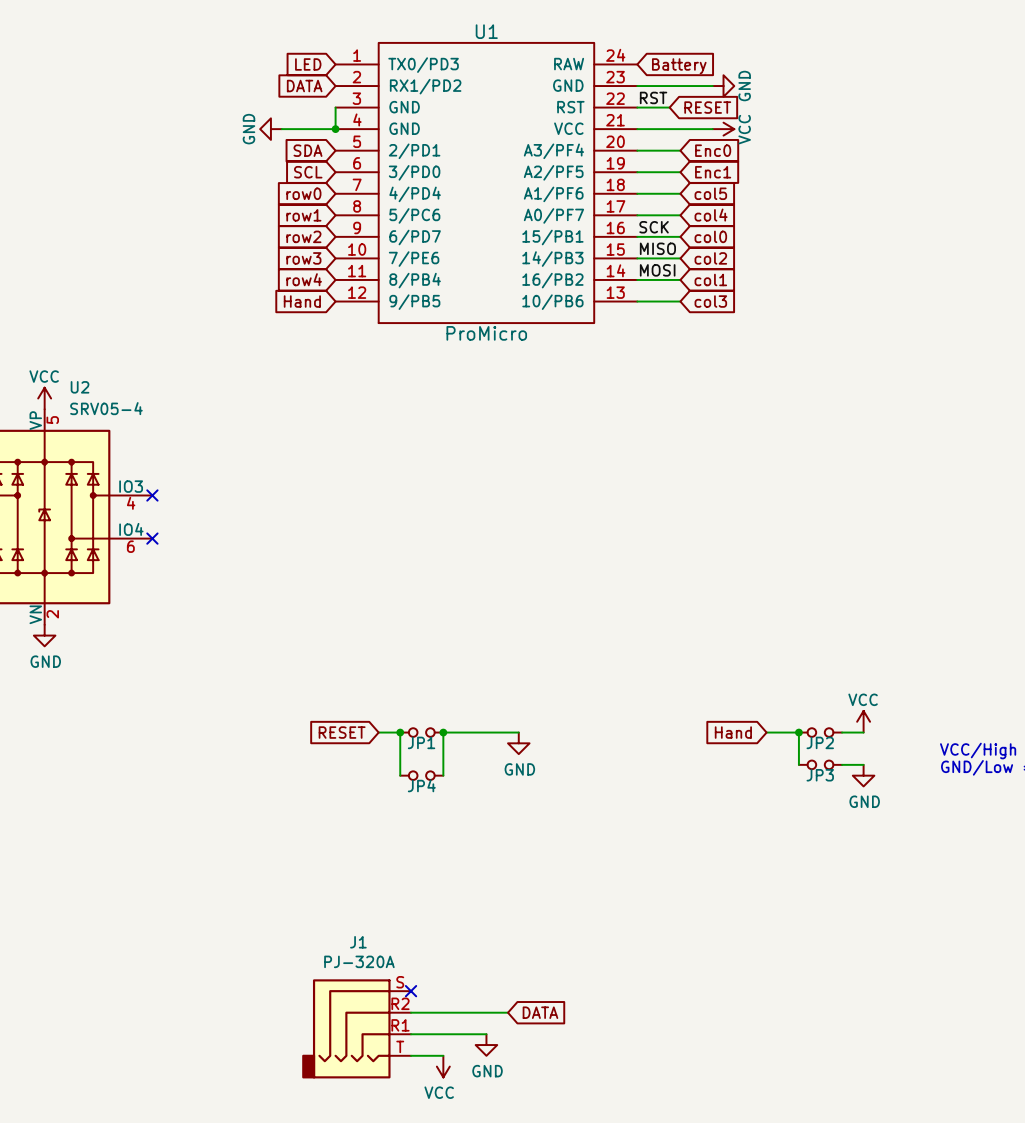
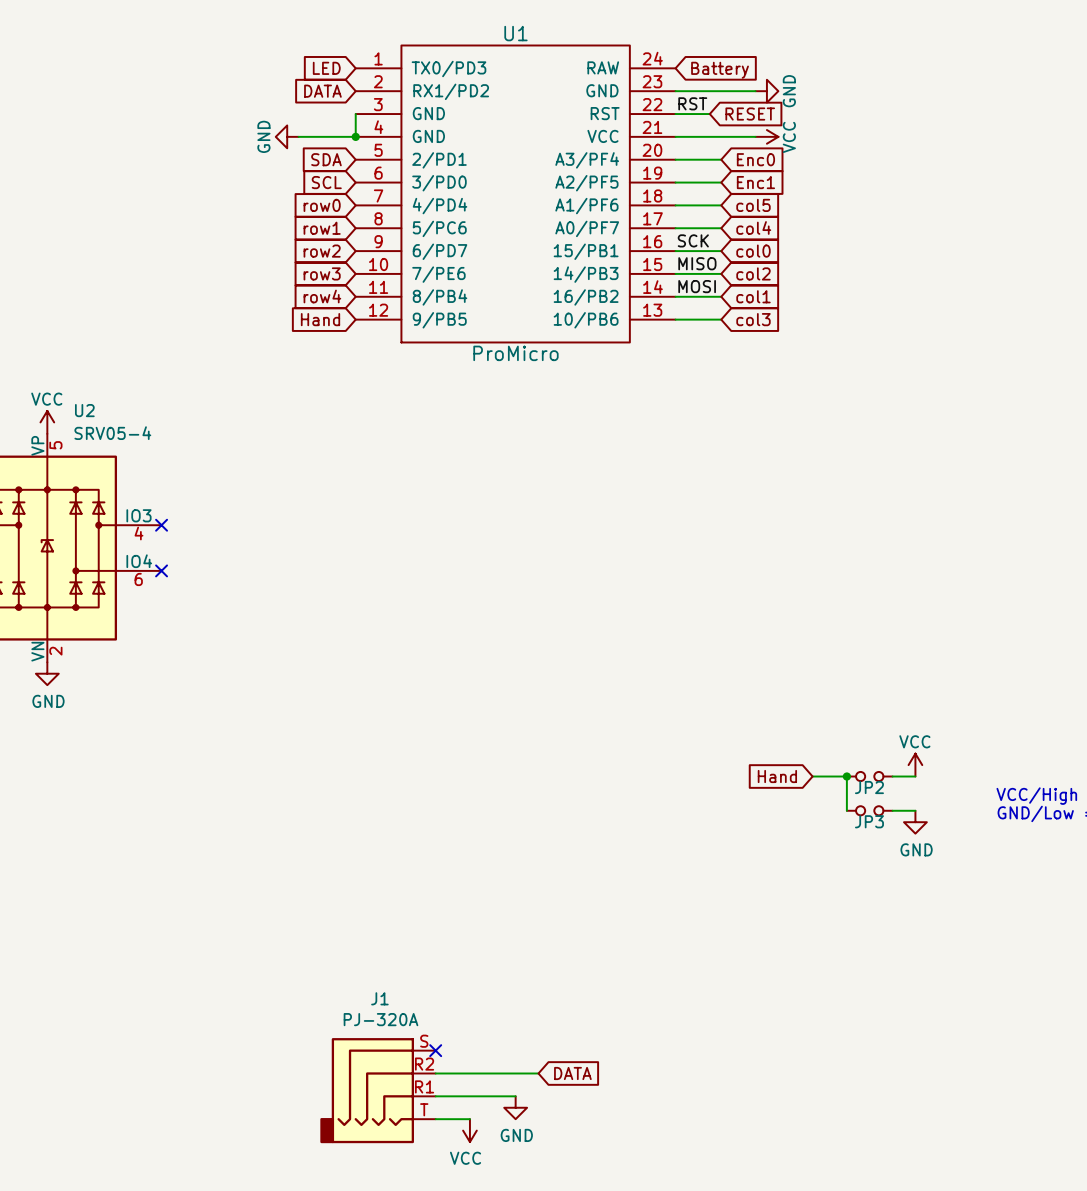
global label: RESET (342, 732) -> none
wire: (378, 732) (400, 732) (400, 775) -> none
junction: (400, 732) -> none
JP1: (421, 732) -> none
junction: (443, 732) -> none
wire: (518, 732) (443, 732) (443, 775) -> none
power symbol: GND (518, 743) -> none
JP4: (421, 775) -> none

